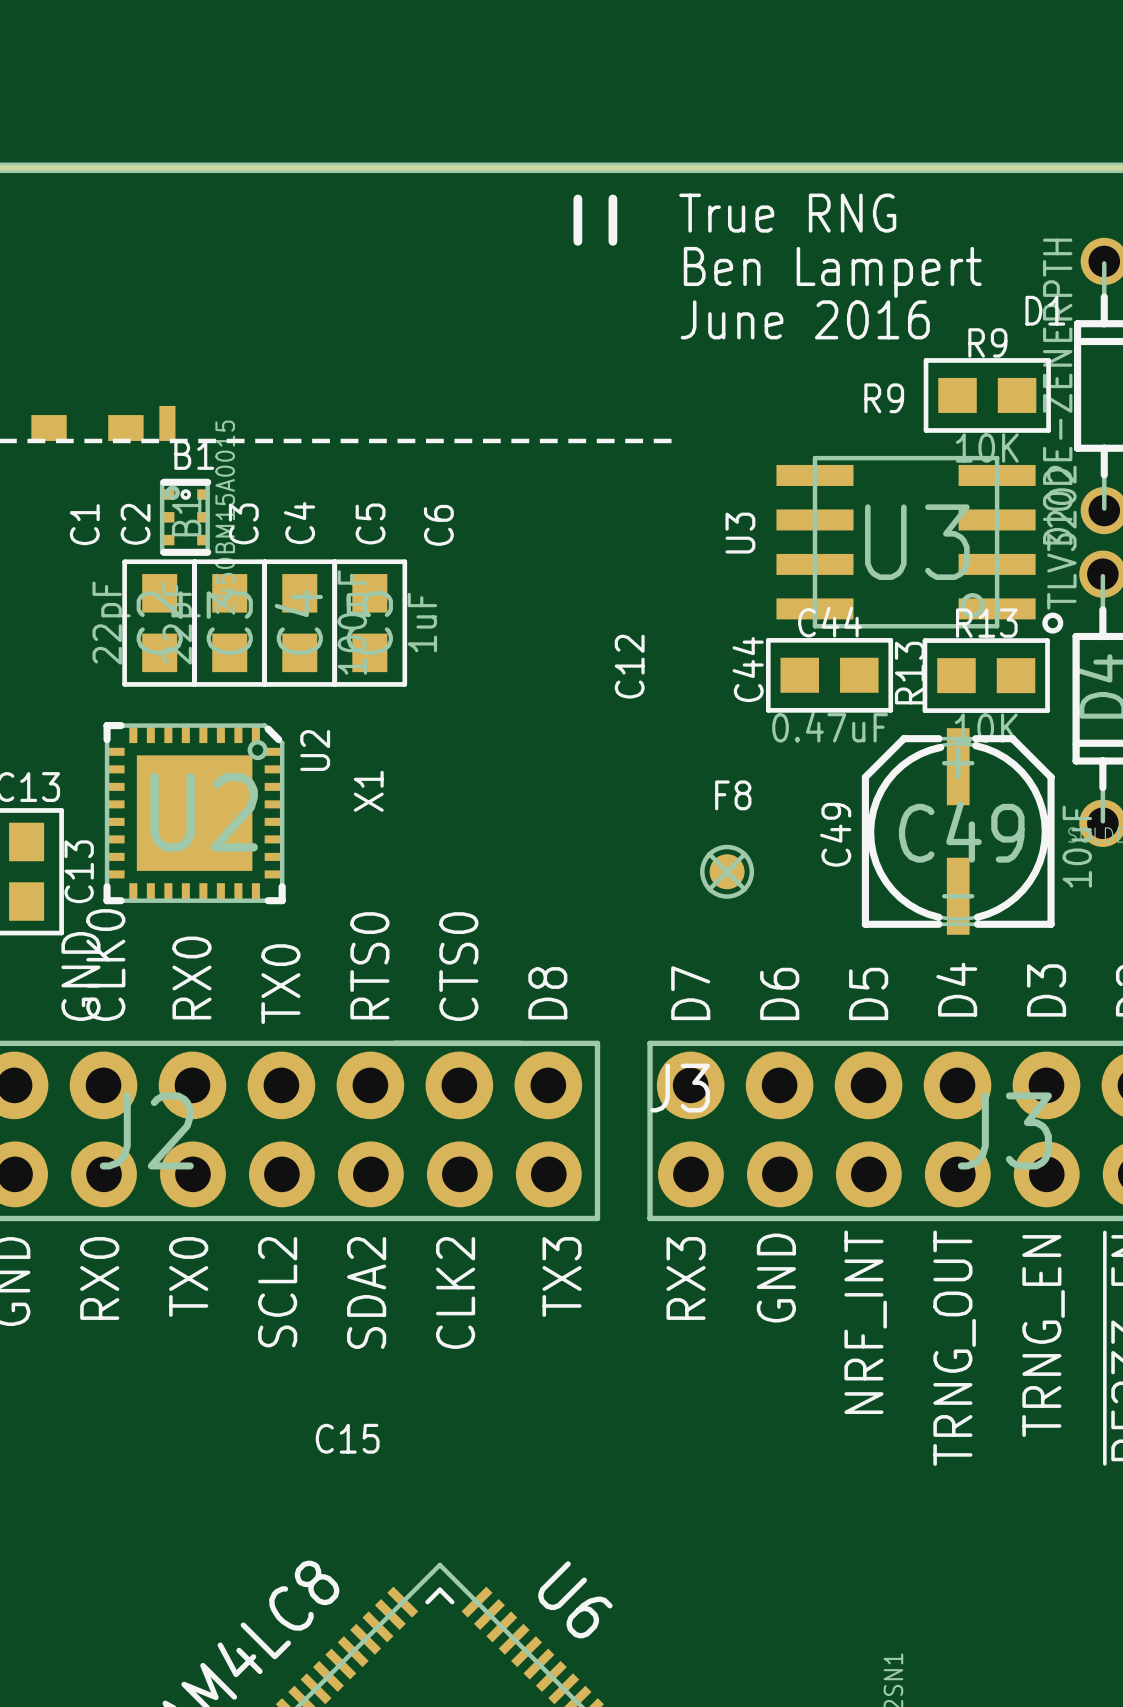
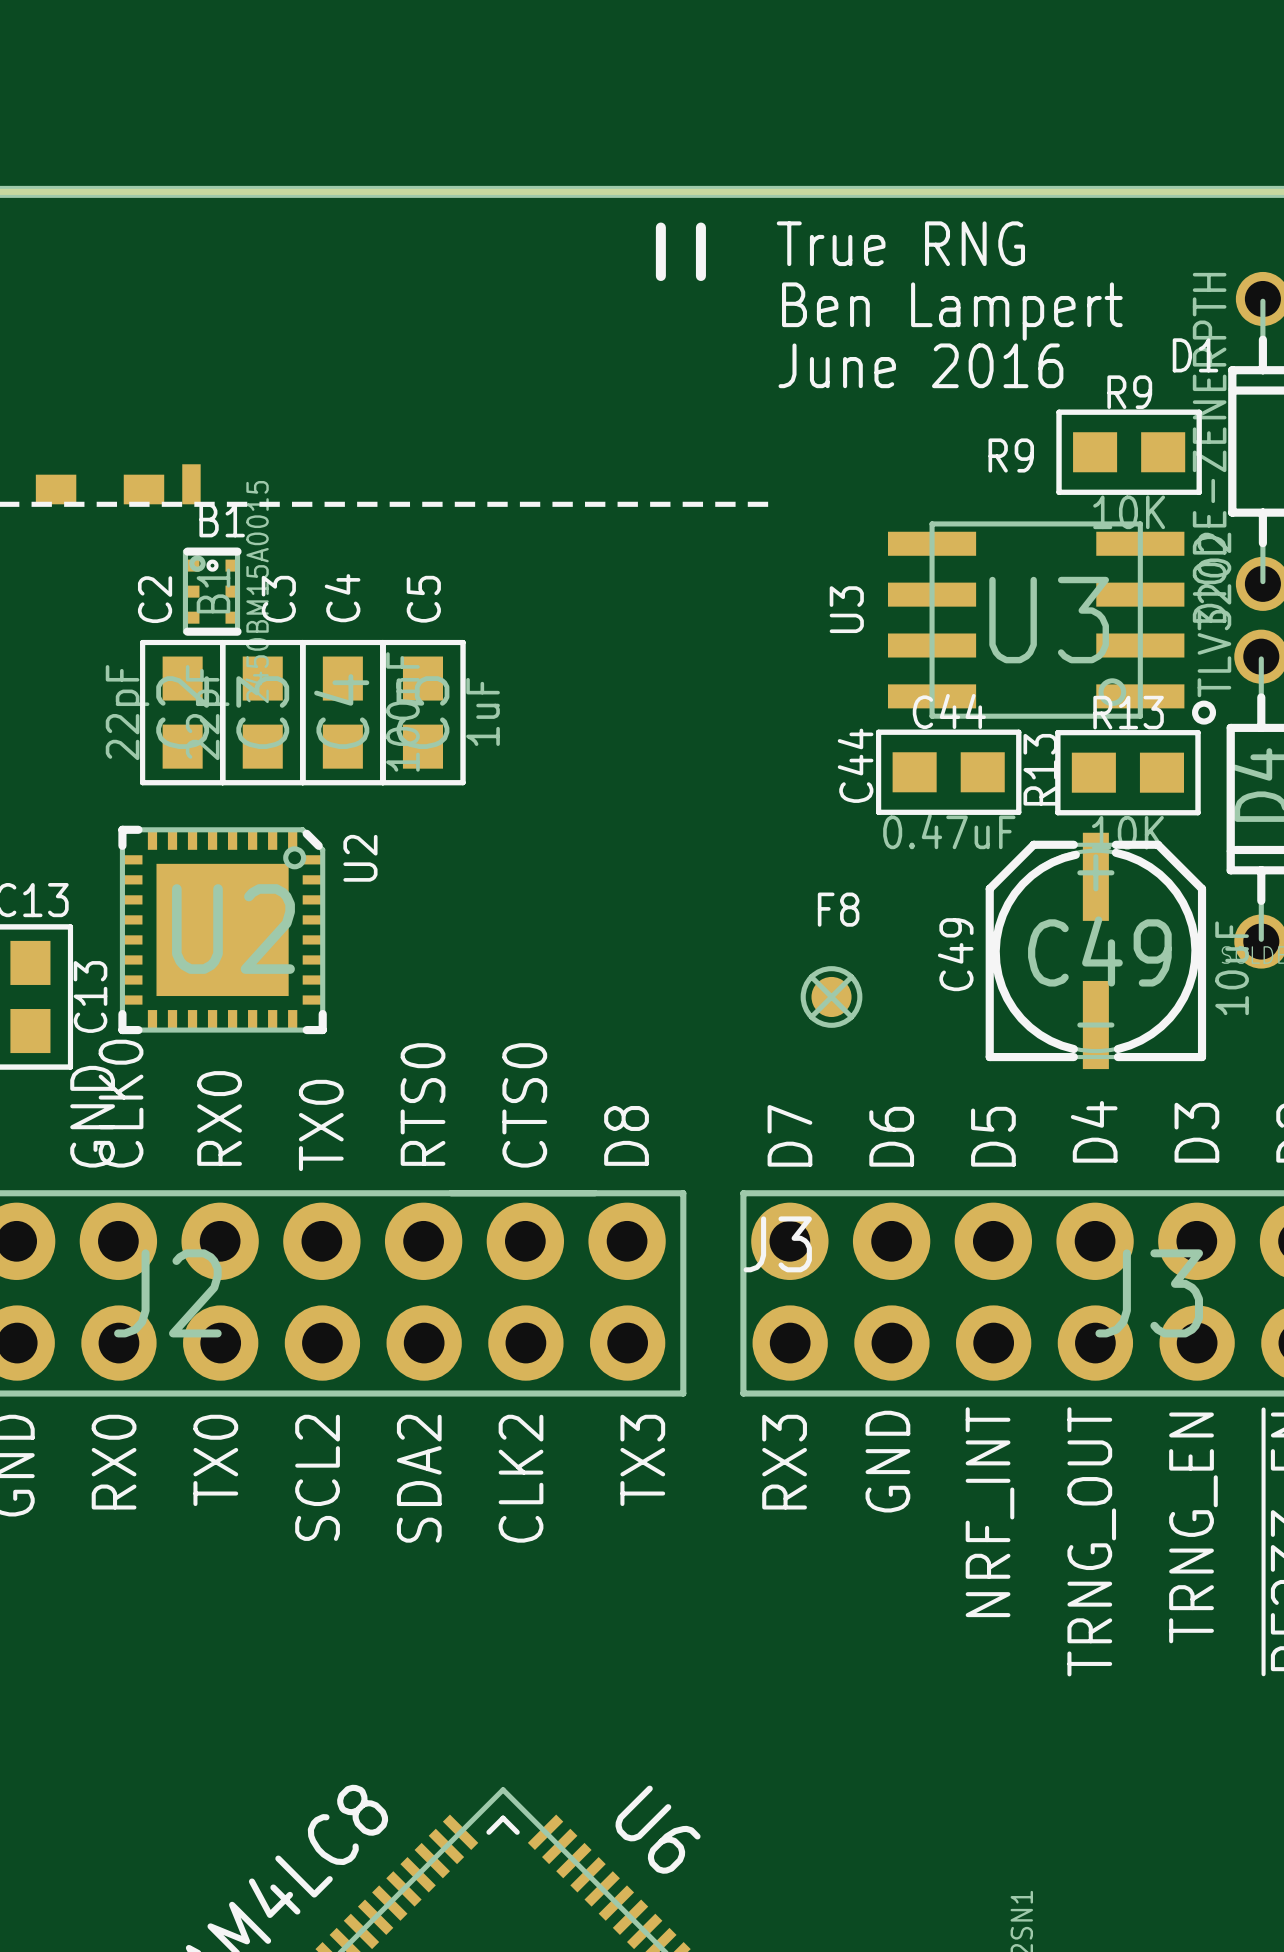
text: C1 (84, 524) -> none
text: C6 (438, 525) -> none
text: C12 (629, 666) -> none
text: X1 (368, 791) -> none
text: C15 (347, 1438) -> none

